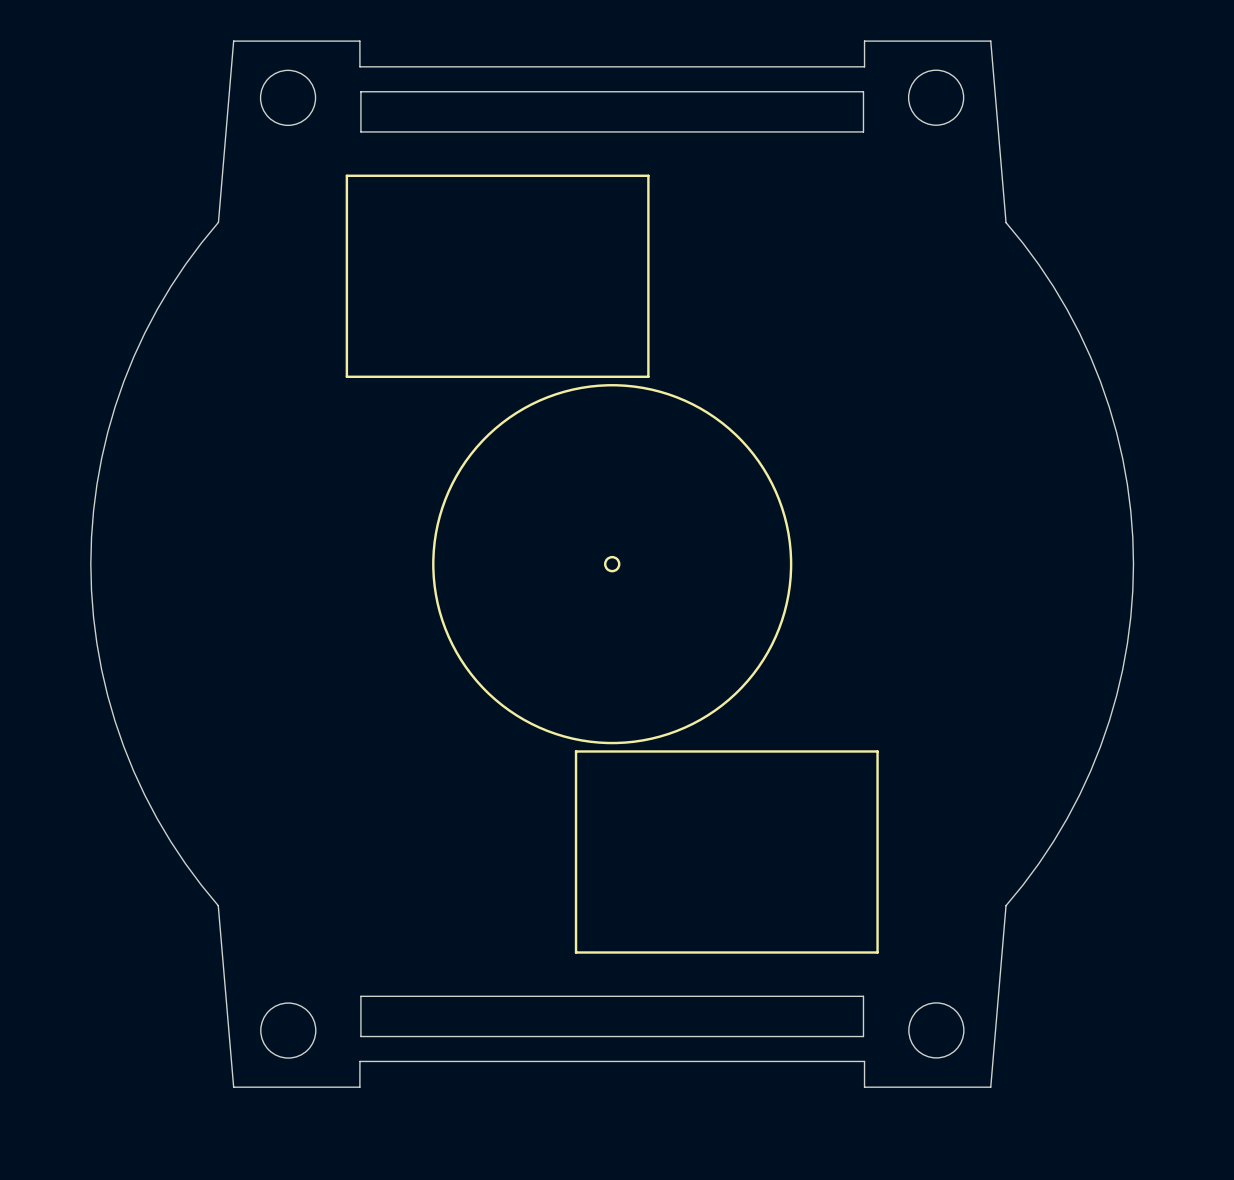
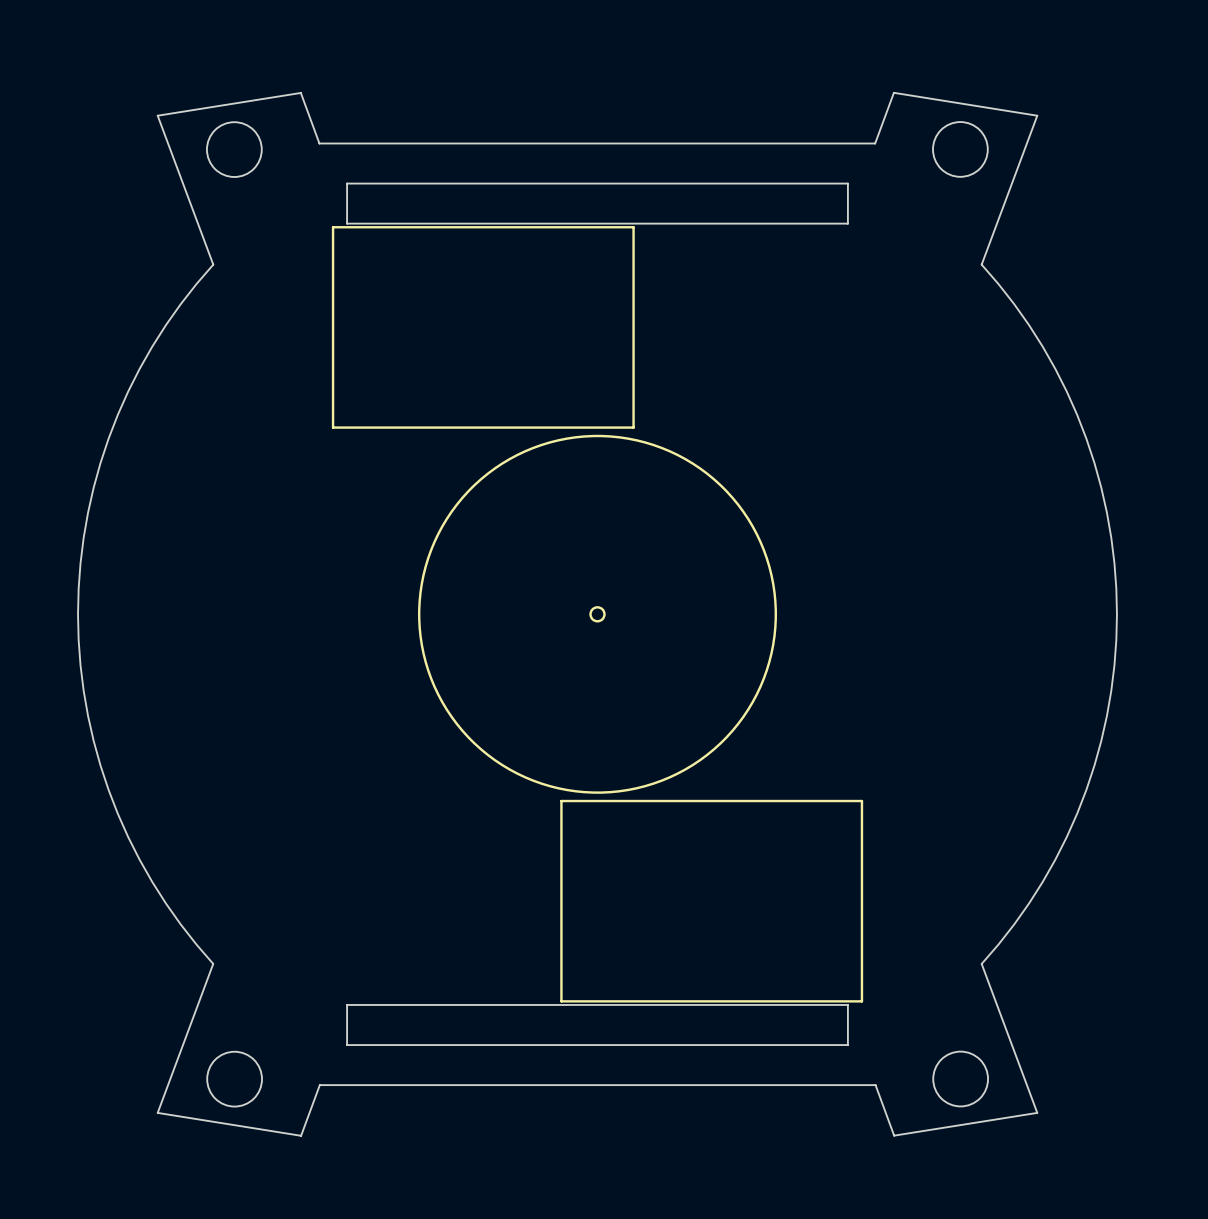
board edge: (233, 41) (359, 41) (359, 66) (864, 66) (864, 41) (990, 41) (1006, 222) (1053, 286) (1079, 333) (1100, 381) (1116, 432) (1127, 484) (1133, 564) (1130, 617) (1122, 669) (1100, 746) (1079, 795) (1053, 841) (1006, 905) (990, 1087) (864, 1087) (864, 1061) (359, 1061) (359, 1087) (233, 1087) (218, 905) (185, 863) (157, 818) (123, 746) (107, 695) (96, 643) (90, 564) (93, 510) (101, 458) (123, 381) (157, 309) (185, 264) (218, 222) (233, 41) -> none
board edge: (360, 91) (360, 131) -> (847, 183) (847, 223) (347, 223) (347, 183)
board edge: none -> (347, 143) (319, 143) (300, 92) (157, 115) (213, 264) (180, 304) (152, 346) (128, 391) (108, 438) (88, 512) (80, 563) (78, 614) (83, 690) (93, 740) (108, 789) (128, 836) (152, 881) (180, 924) (213, 963) (157, 1112) (301, 1135) (319, 1085) (347, 1085)
board edge: (863, 91) (863, 131) -> (847, 143) (875, 143) (893, 92) (1037, 115) (981, 264) (1028, 324) (1055, 368) (1077, 414) (1094, 463) (1106, 512) (1114, 563) (1116, 614) (1111, 690) (1101, 740) (1086, 789) (1066, 836) (1042, 882) (1014, 924) (981, 963) (1037, 1112) (894, 1135) (875, 1085) (847, 1085)
round board edge position: (288, 97) -> (234, 149)
round board edge position: (936, 97) -> (960, 149)
board edge: (360, 996) (360, 1036) -> (347, 1045) (347, 1004) (847, 1004) (847, 1045)
board edge: (863, 996) (863, 1036) -> none
round board edge position: (288, 1030) -> (234, 1079)
round board edge position: (936, 1030) -> (960, 1079)

